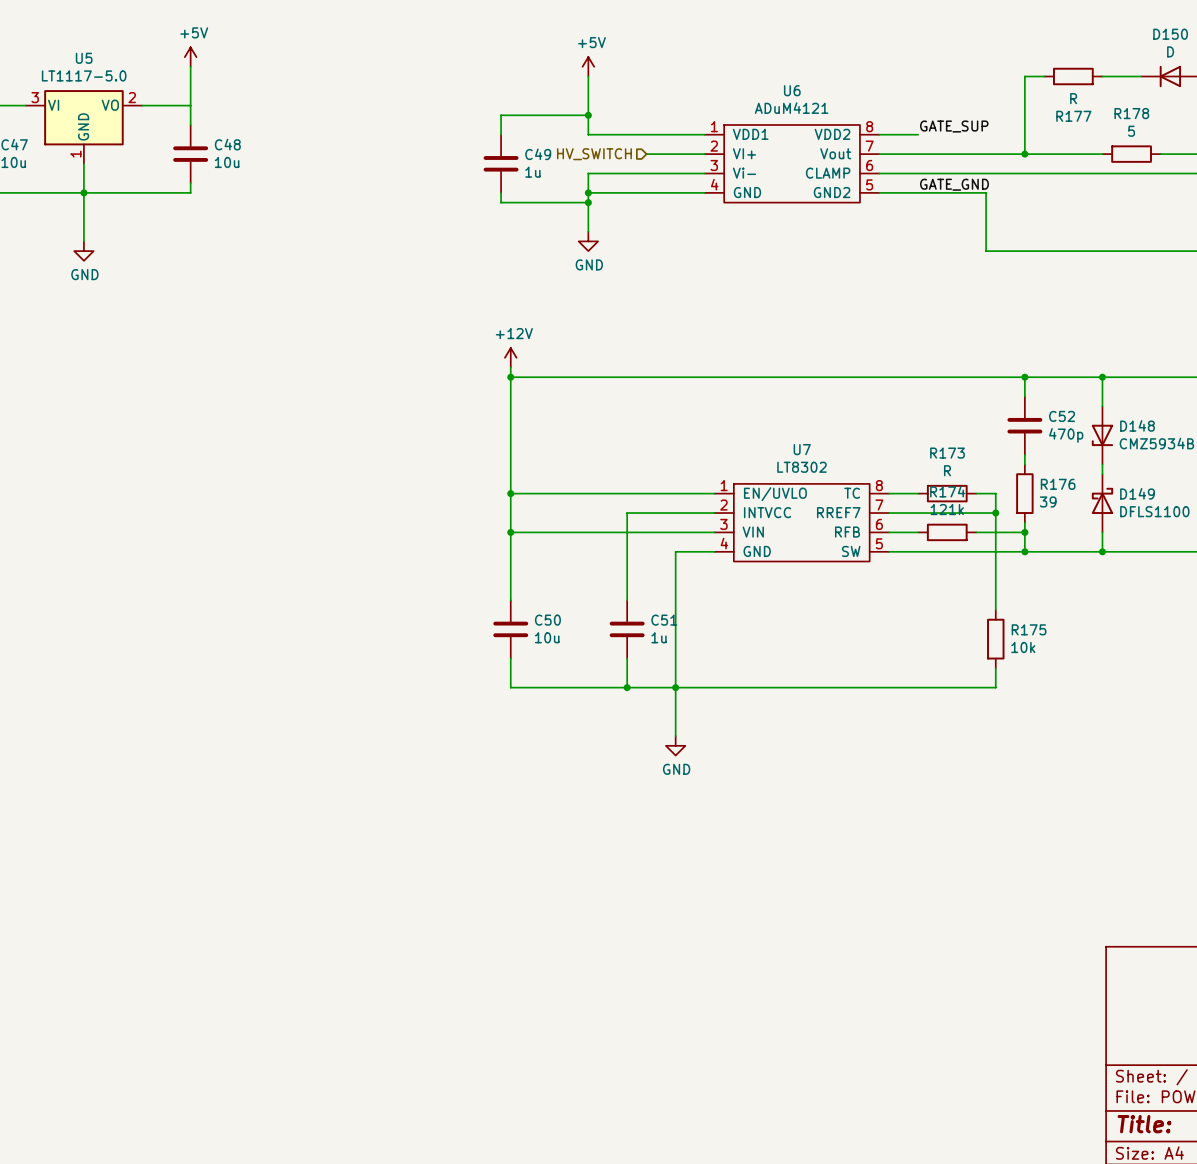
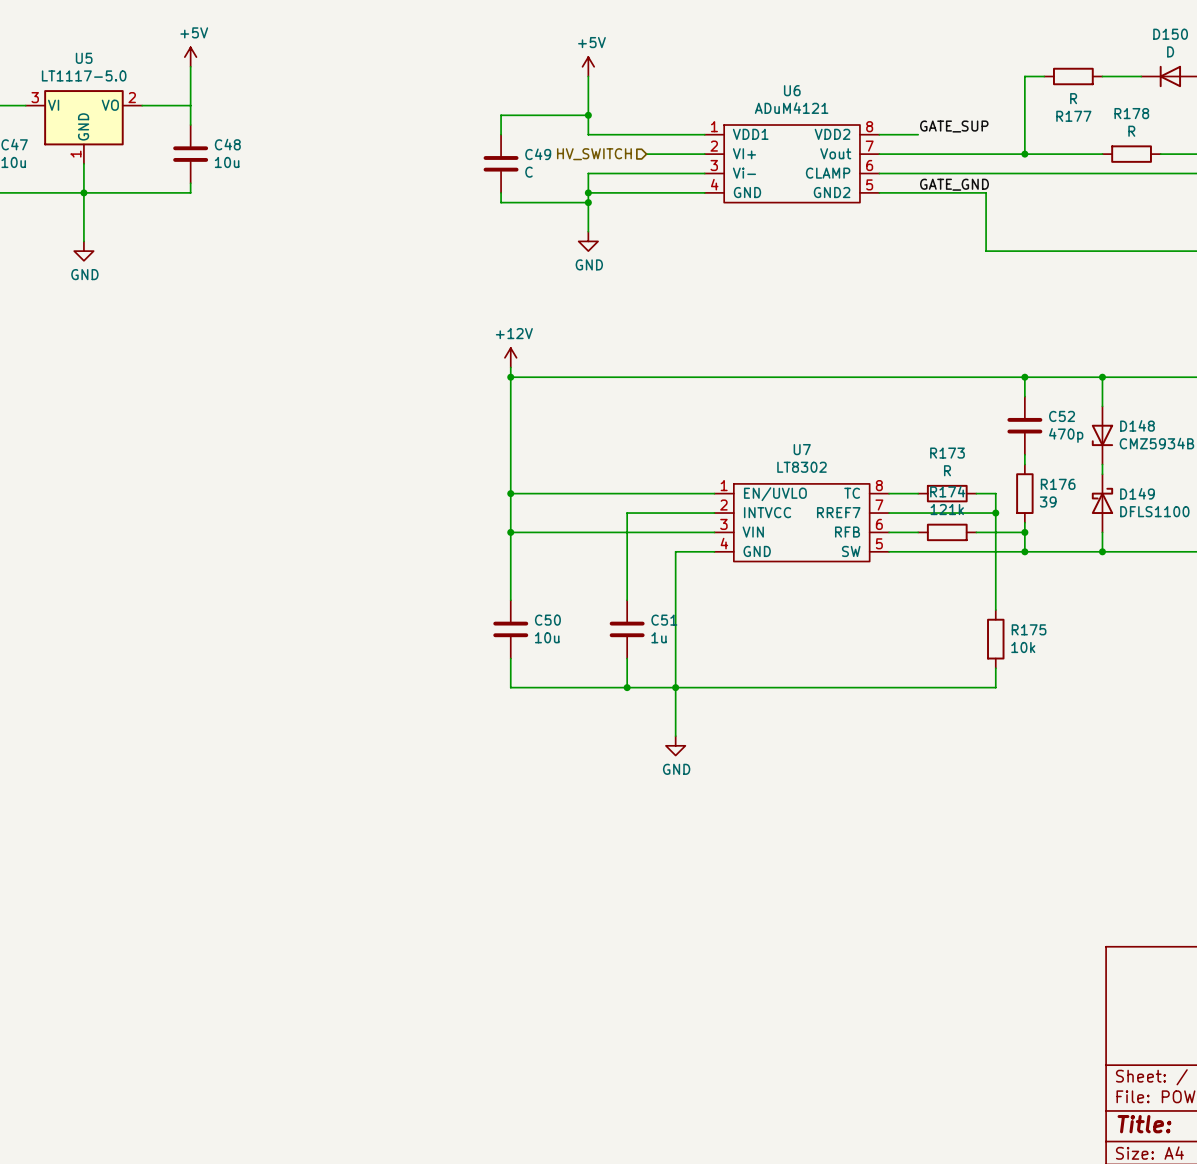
R178 value: 5 (1131, 131) -> R (1131, 131)
C49 value: 1u (532, 172) -> C (528, 172)

